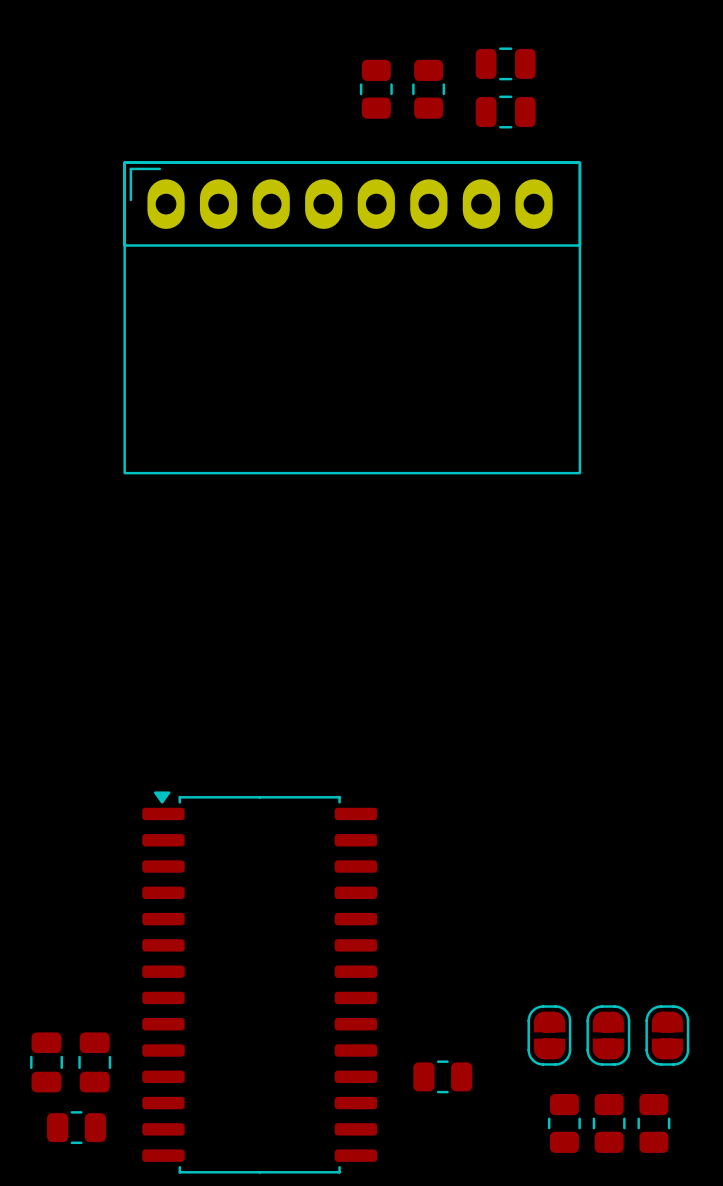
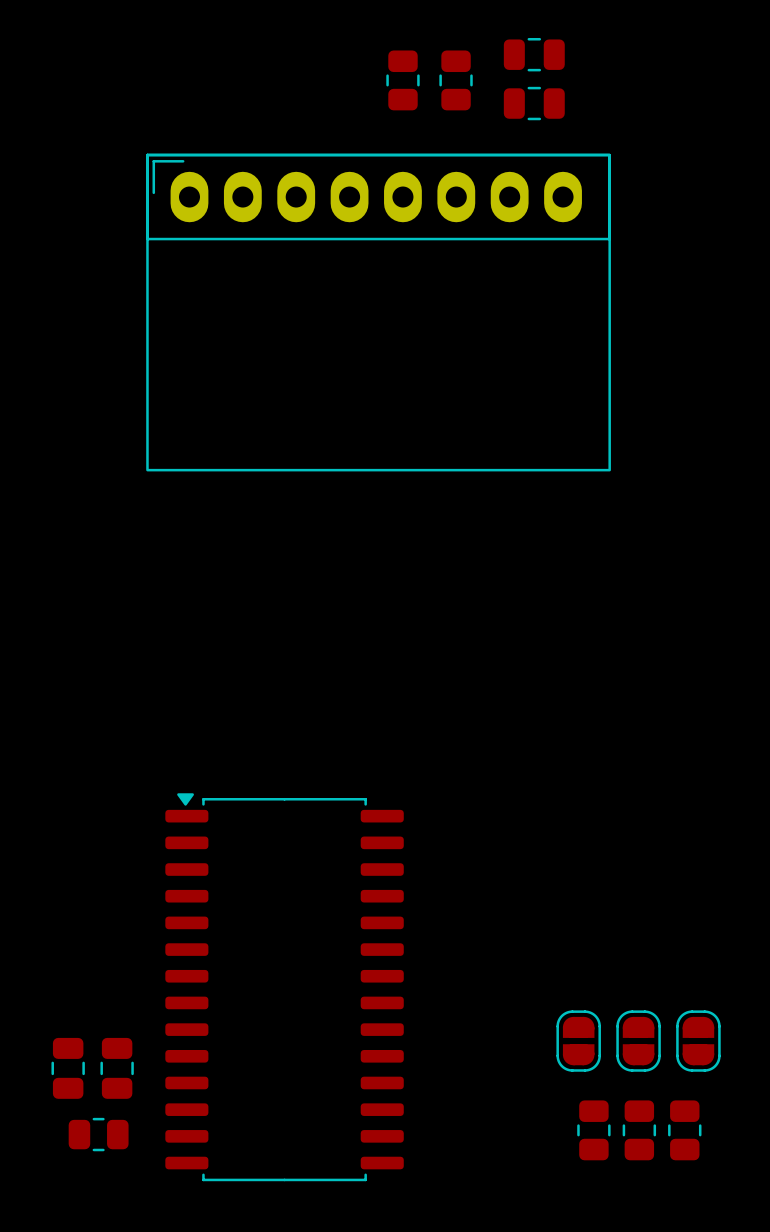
part: (442, 1076) -> none

